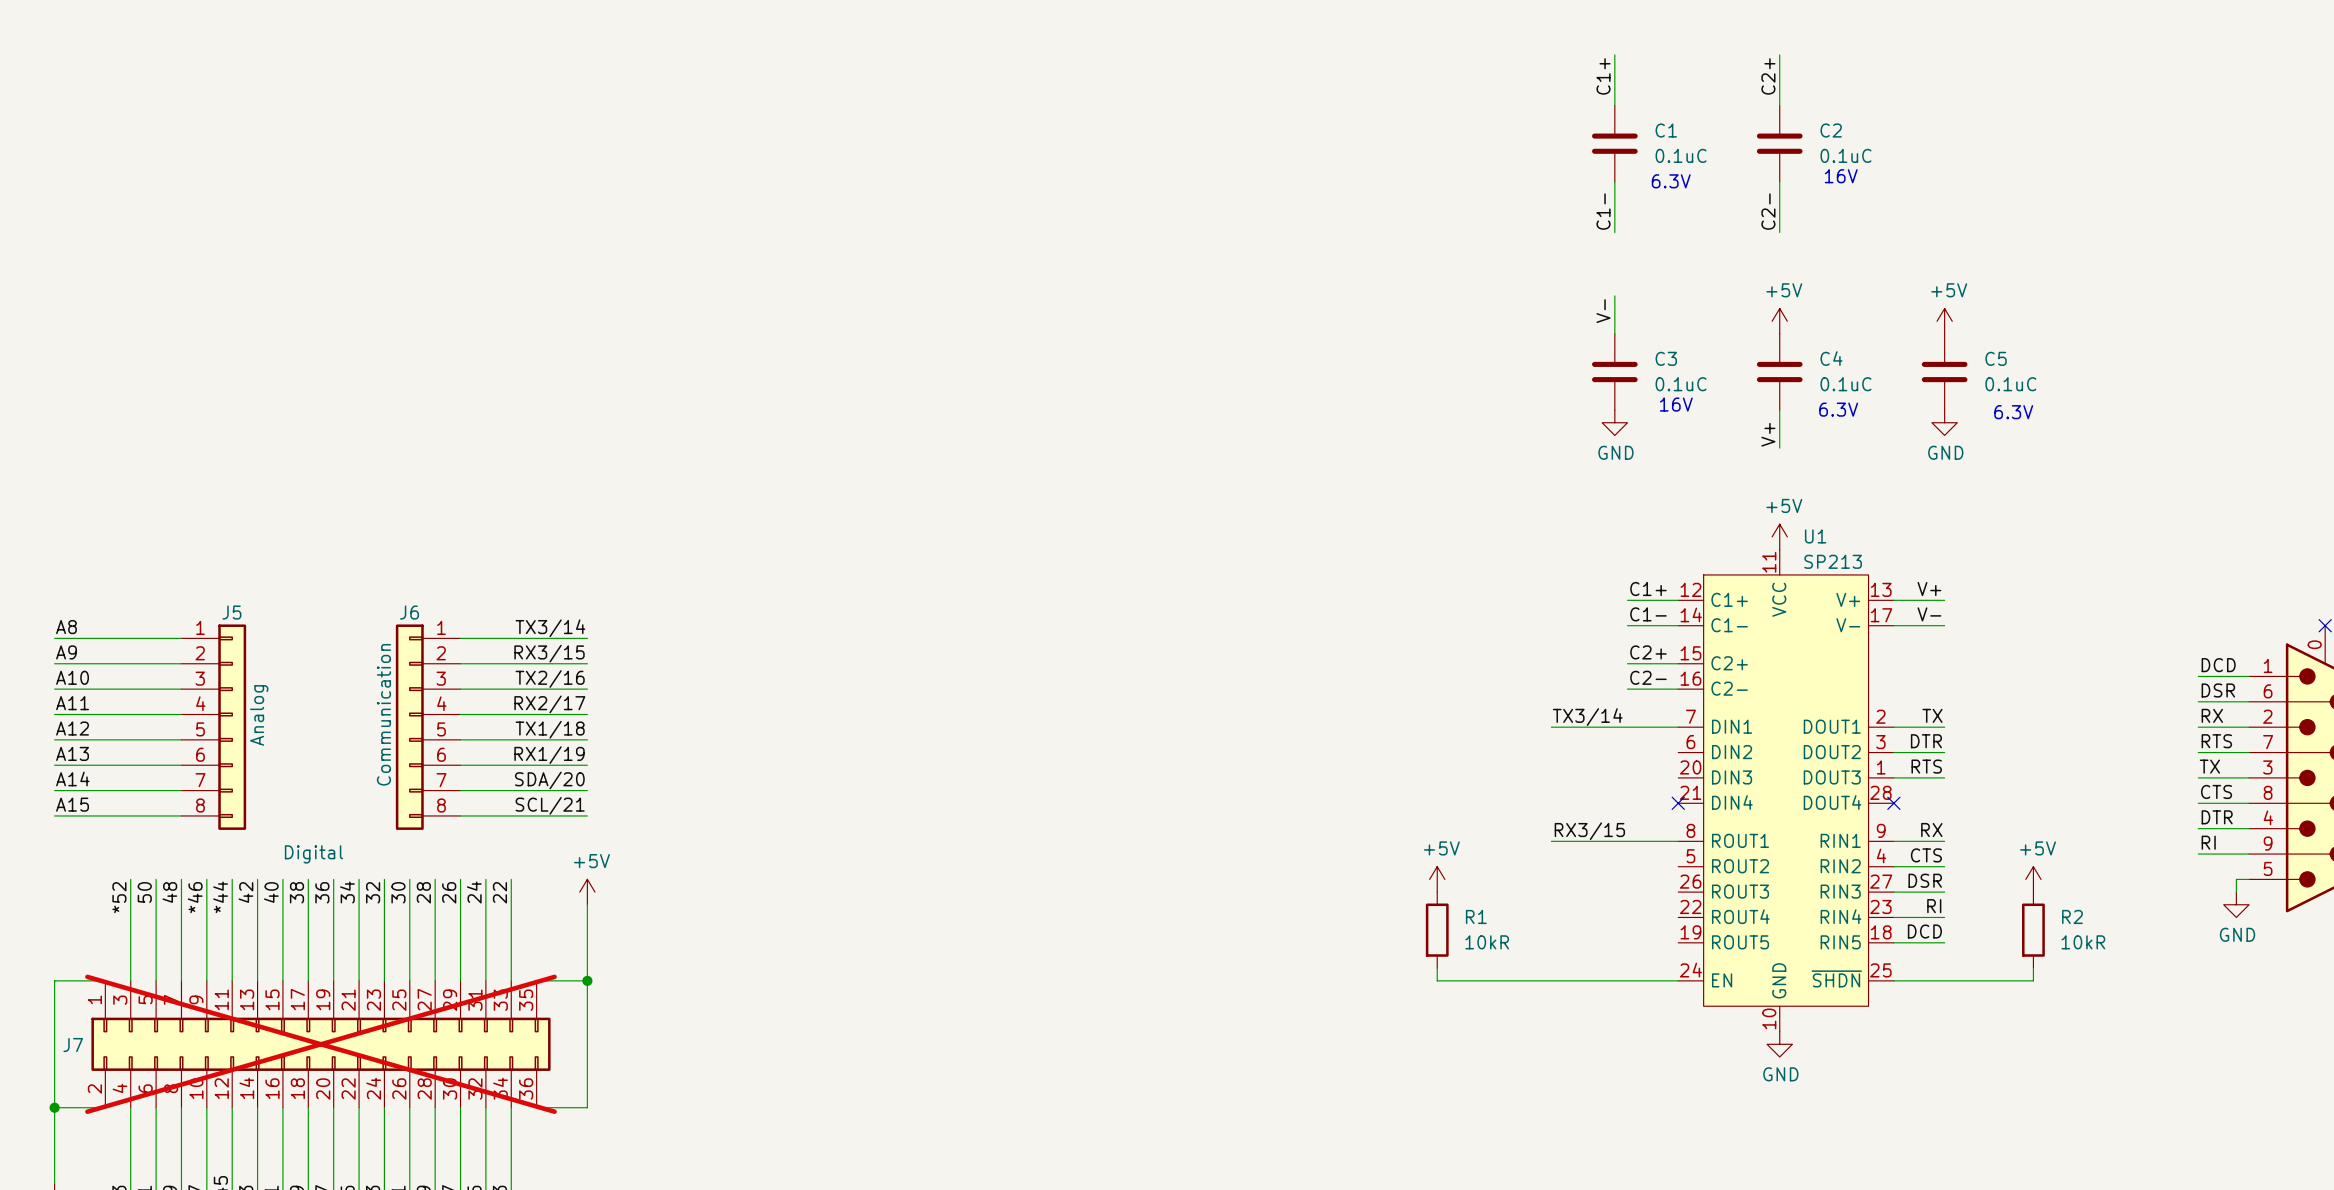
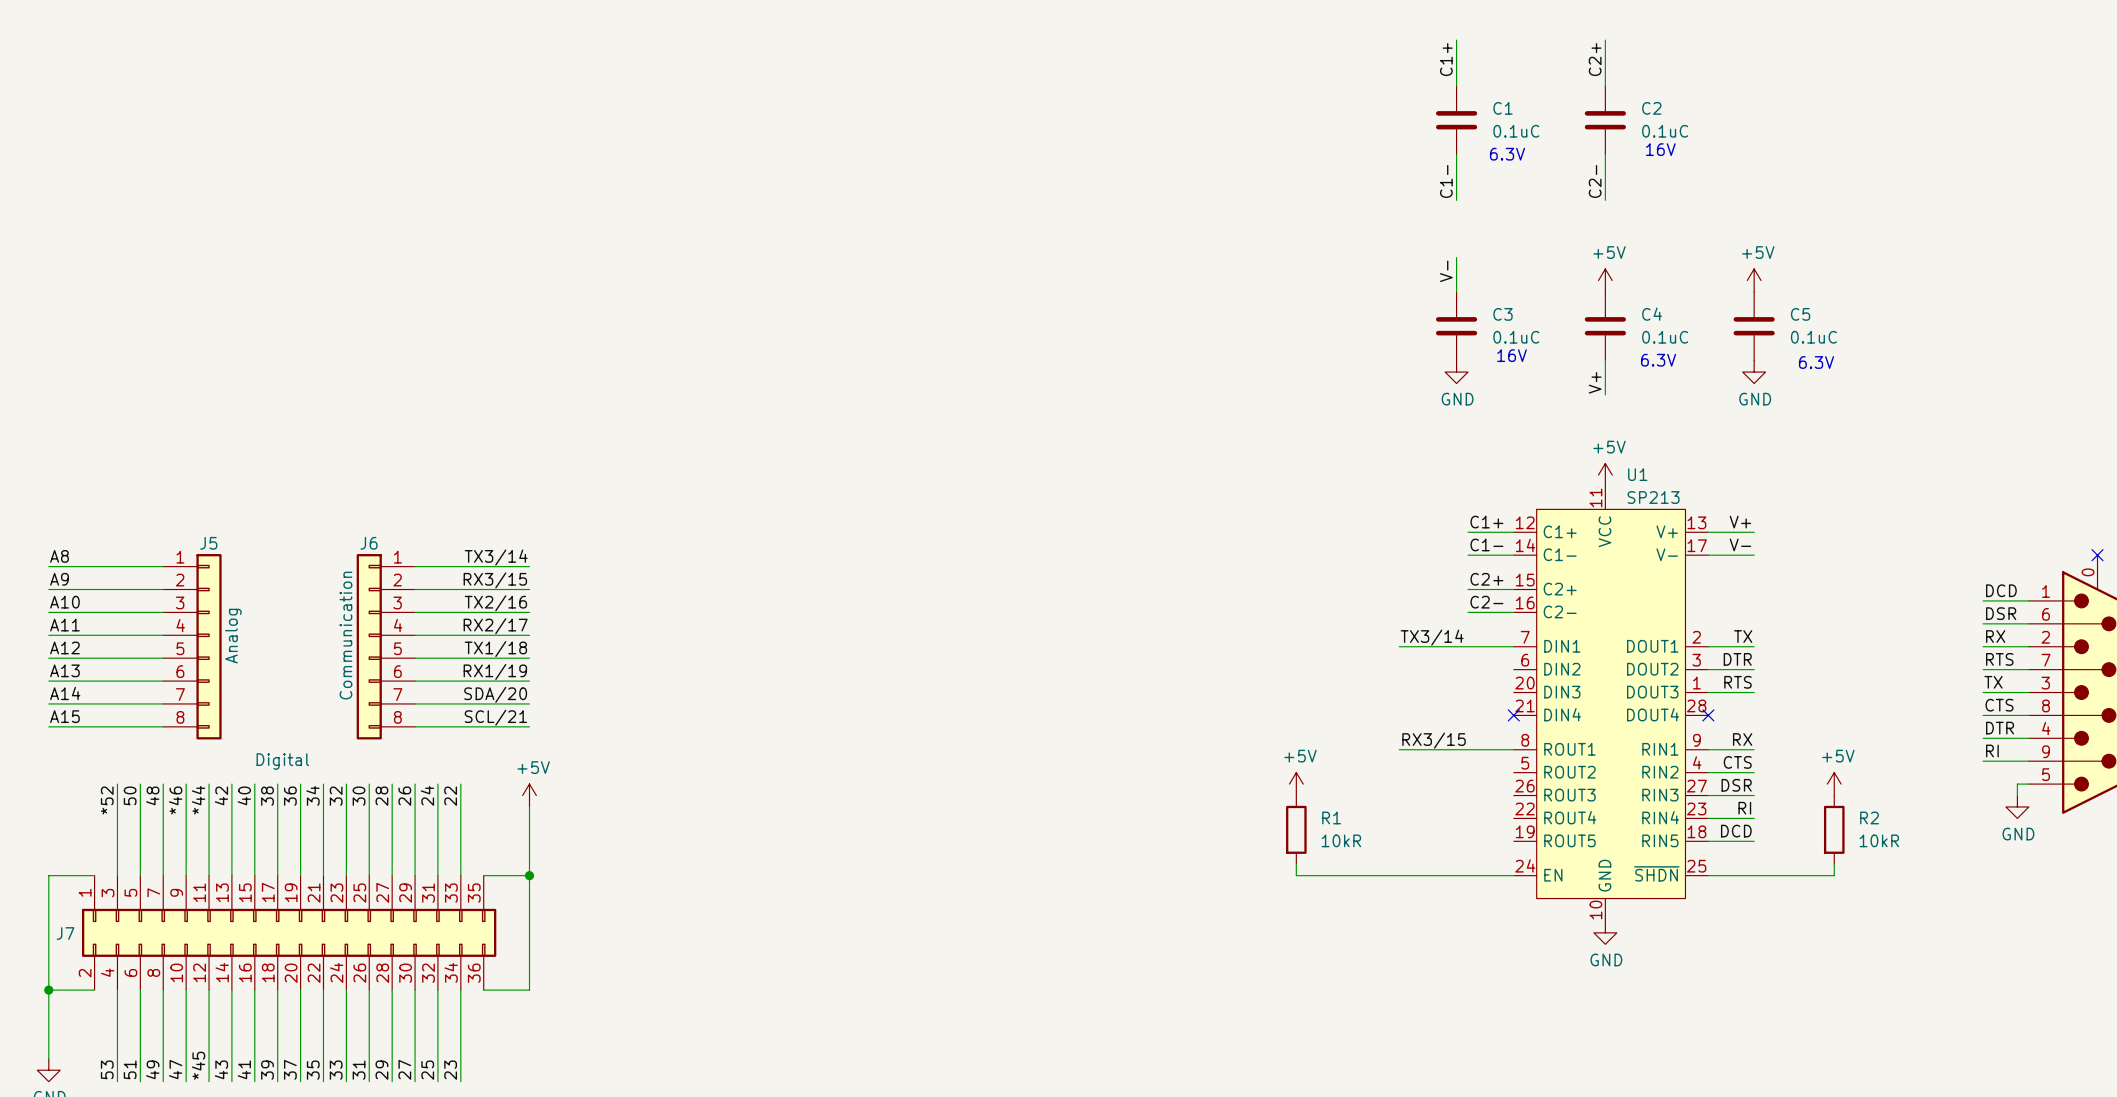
J7 do-not-place cross: (321, 1044) -> none

